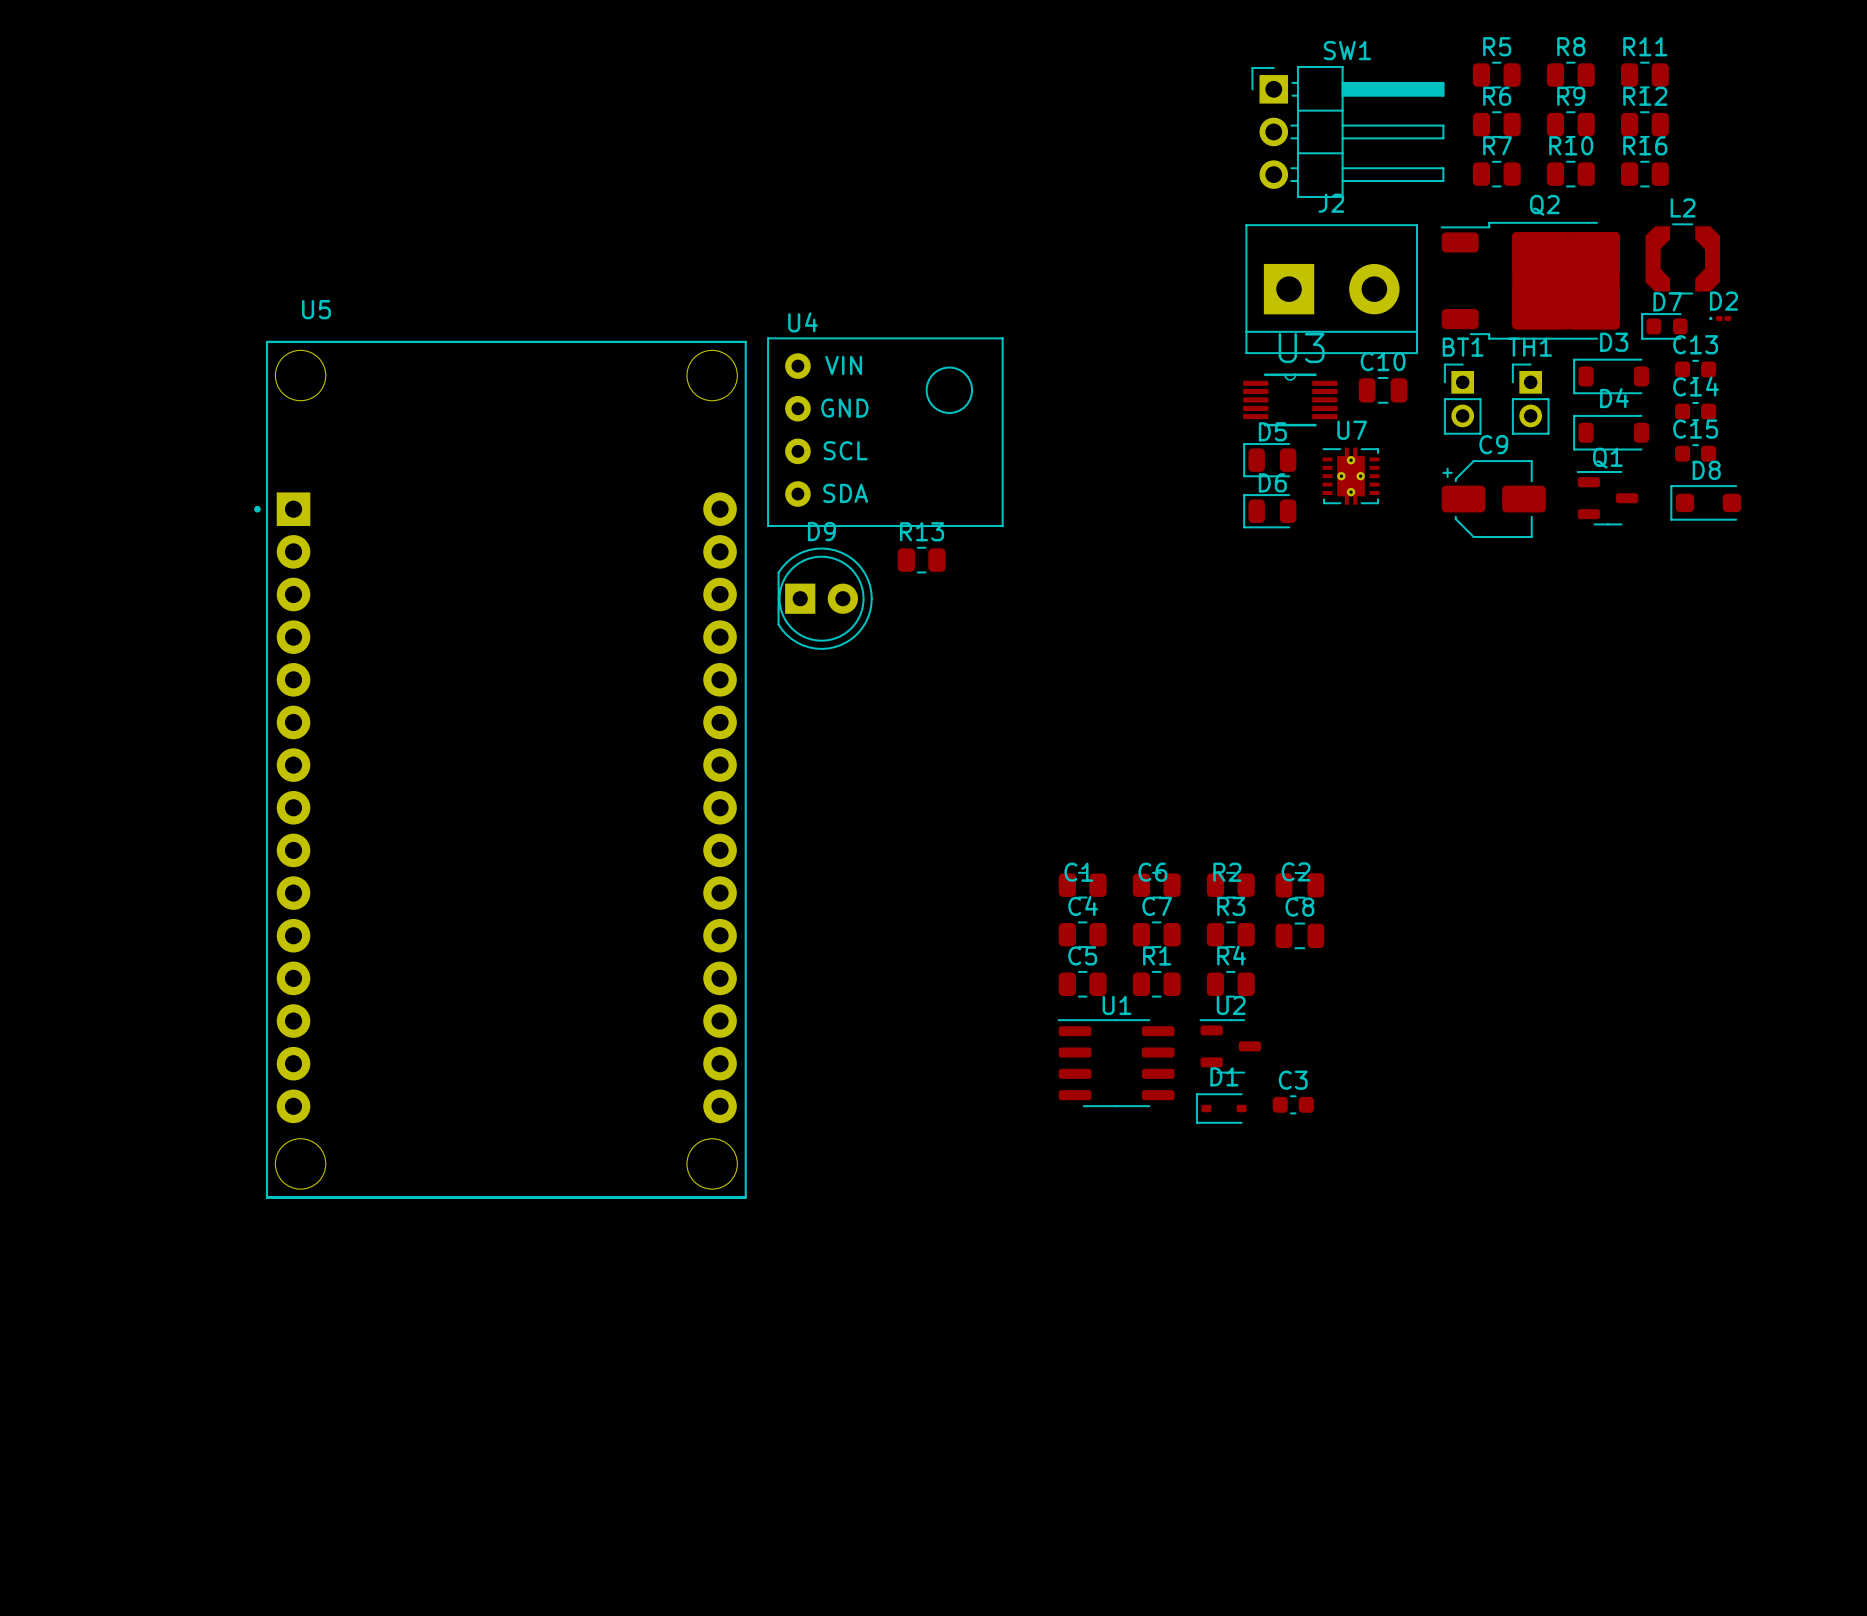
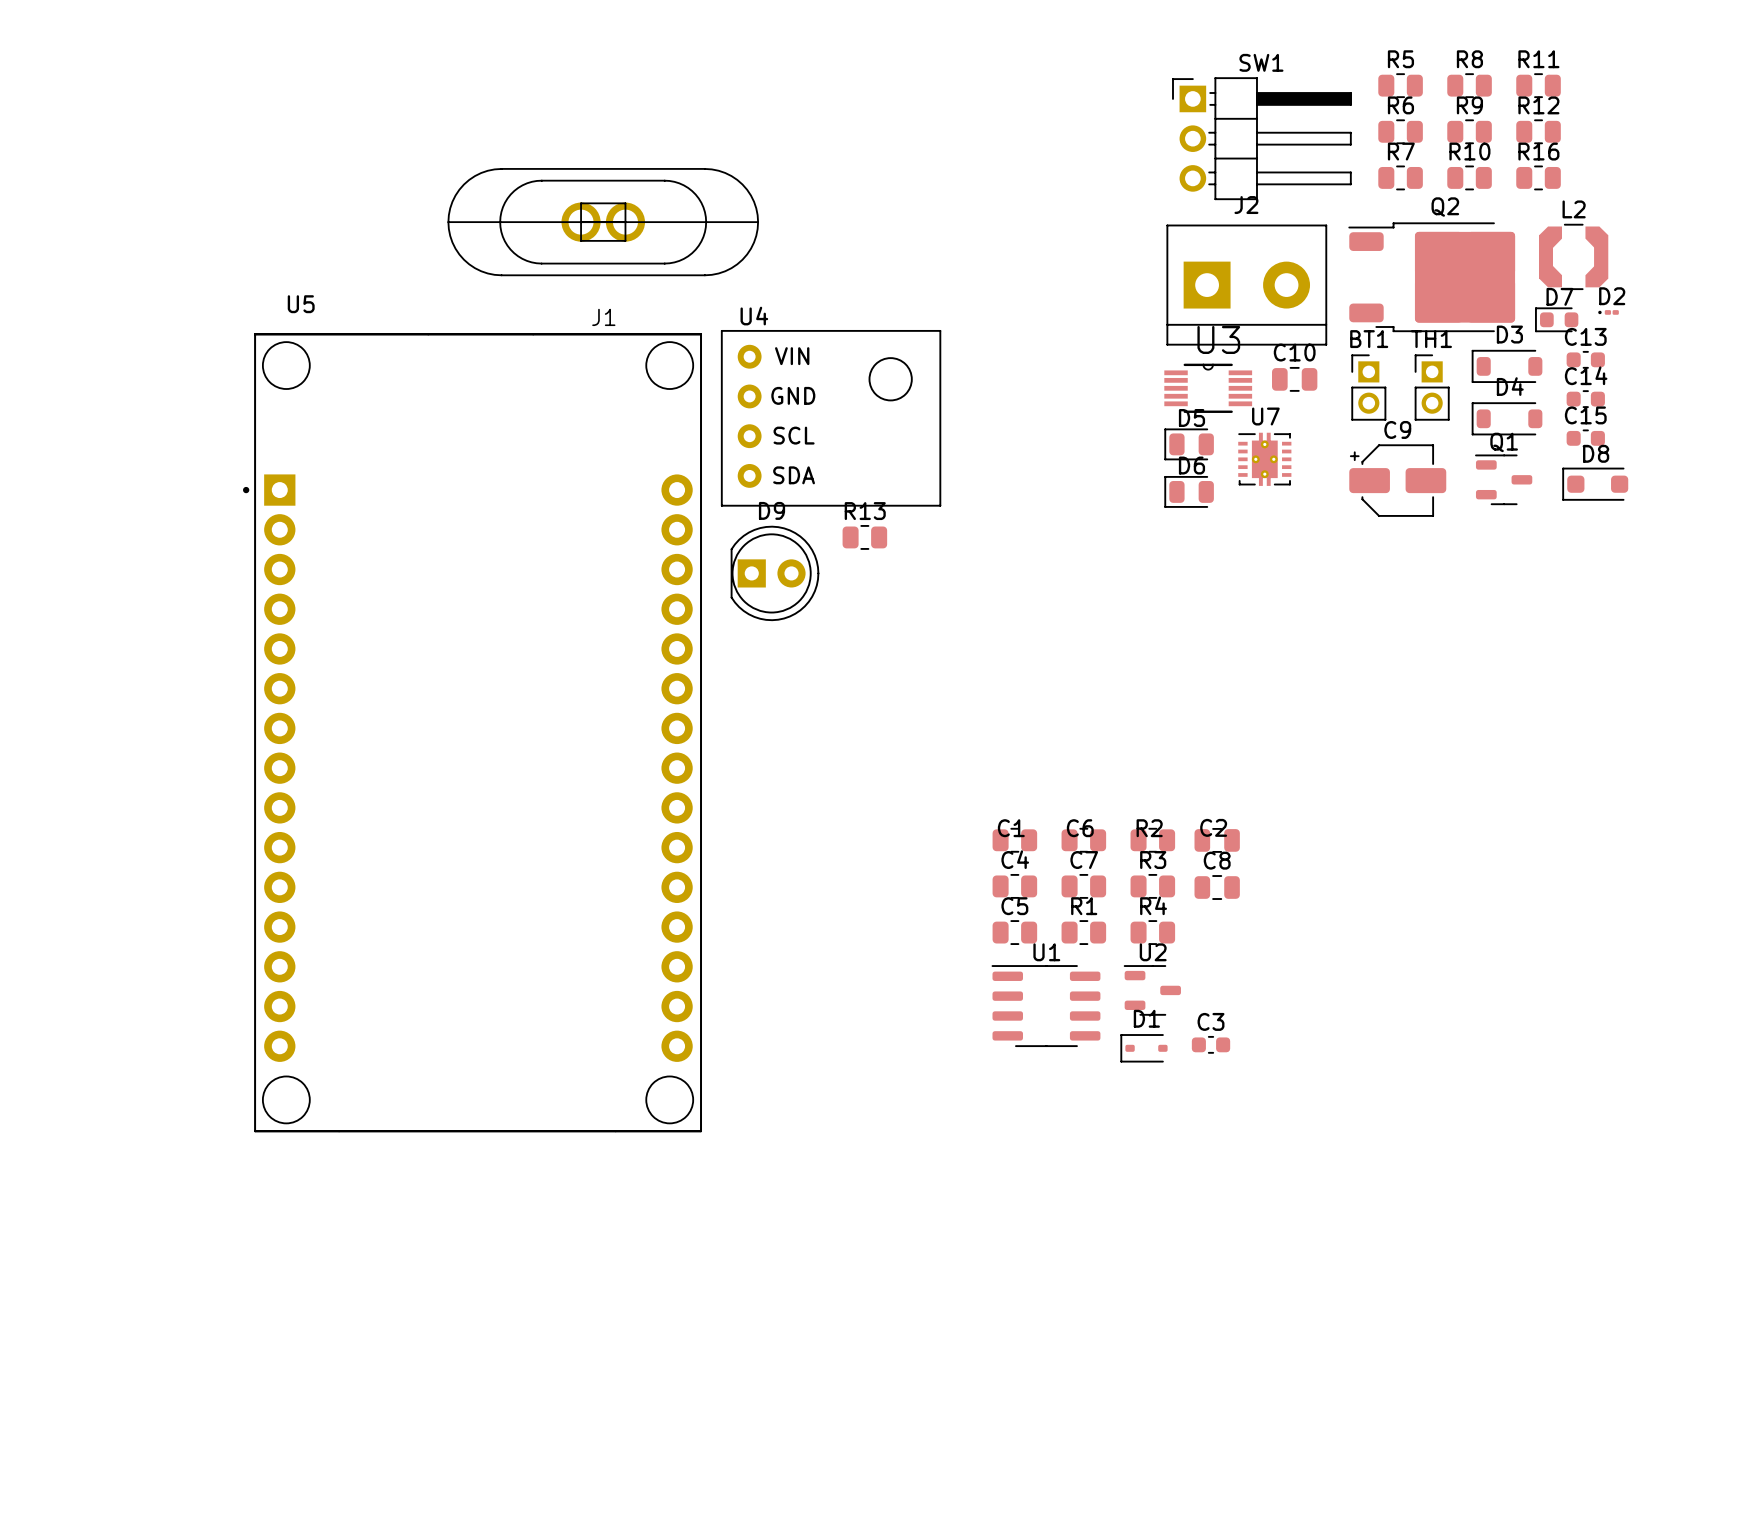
J1: none -> (603, 222)

